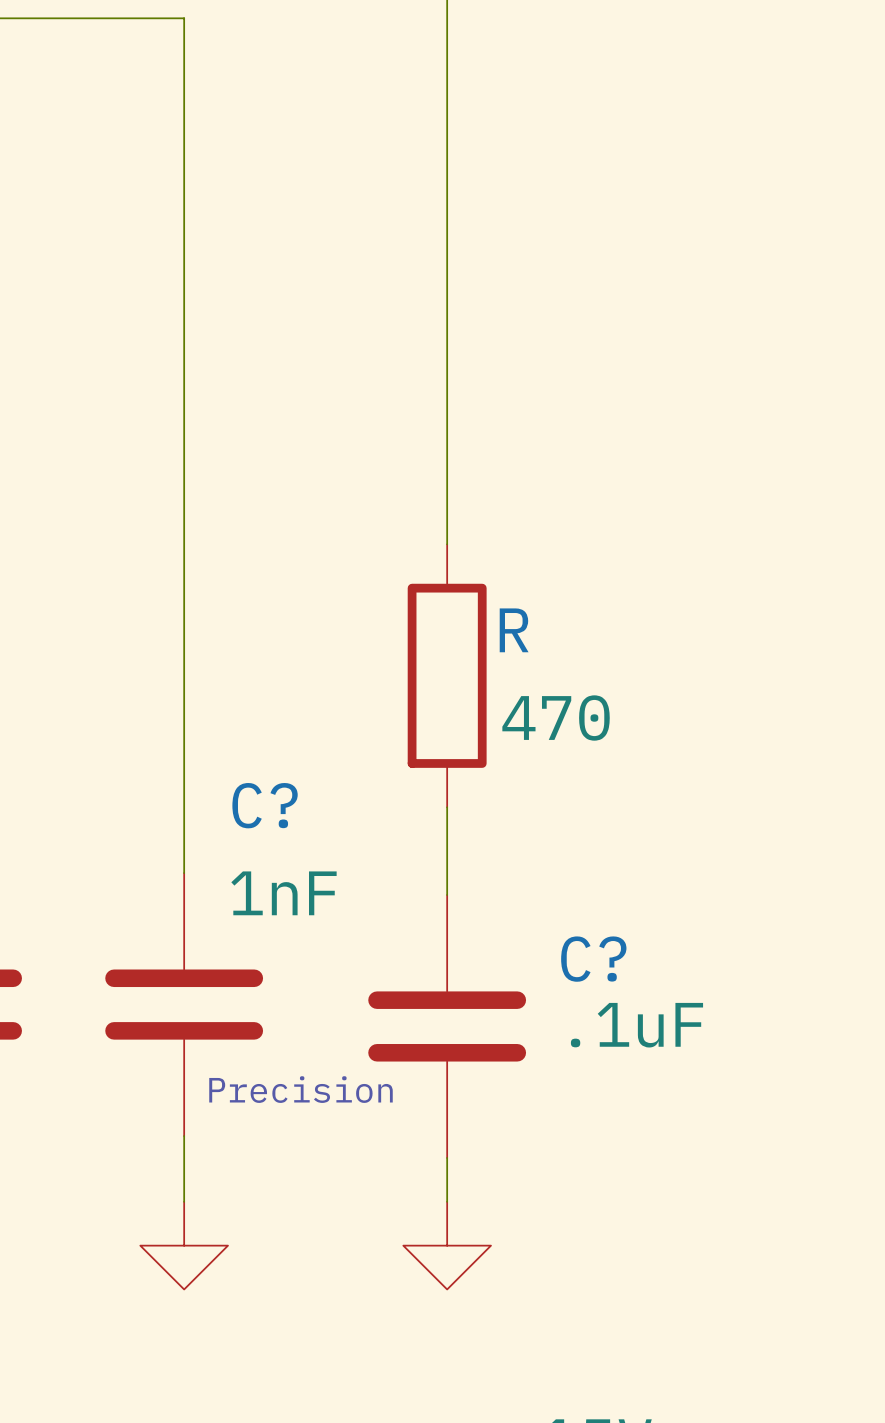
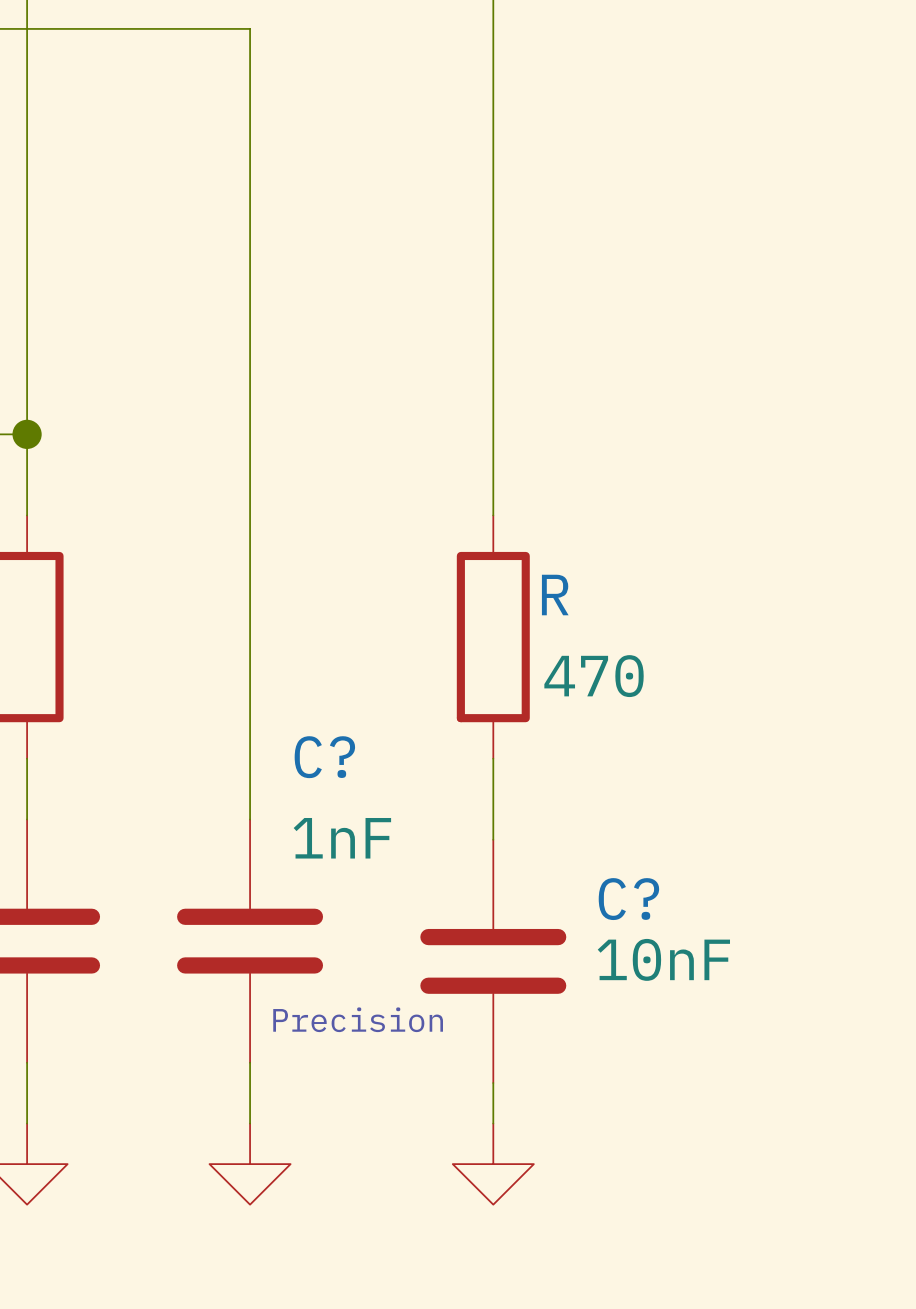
C? value: .1uF (636, 1025) -> 10nF (663, 959)

